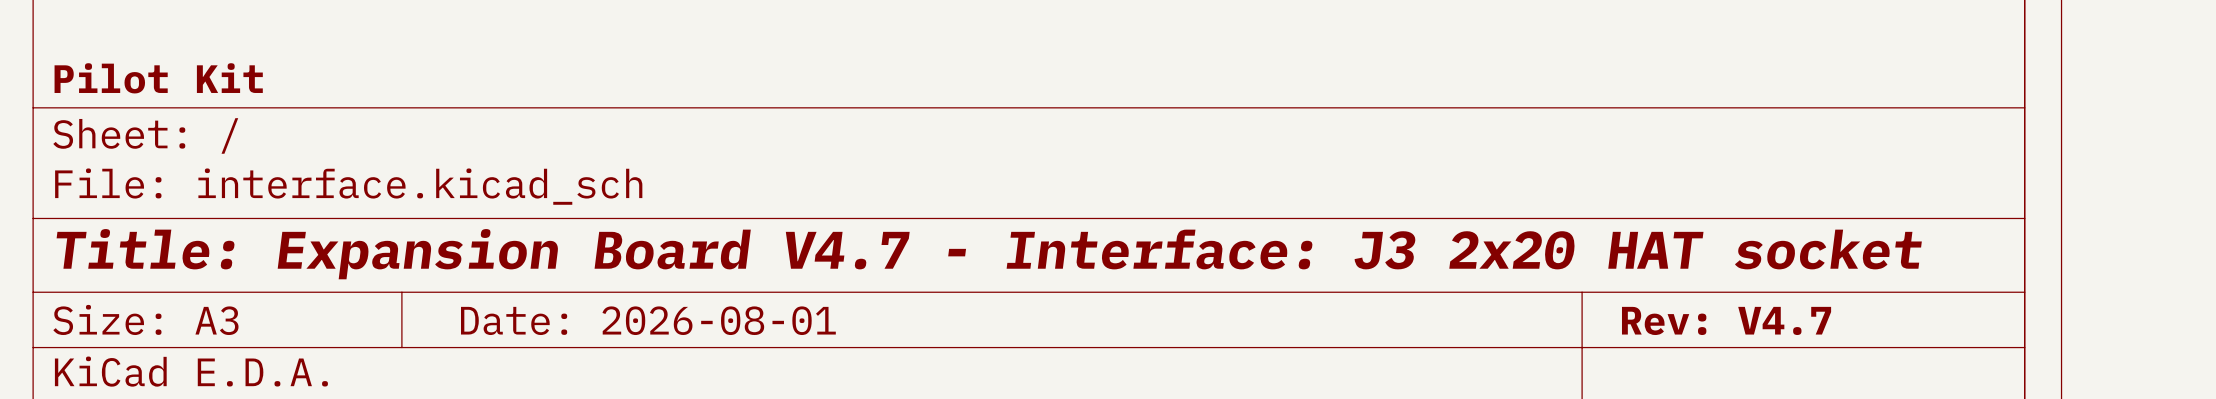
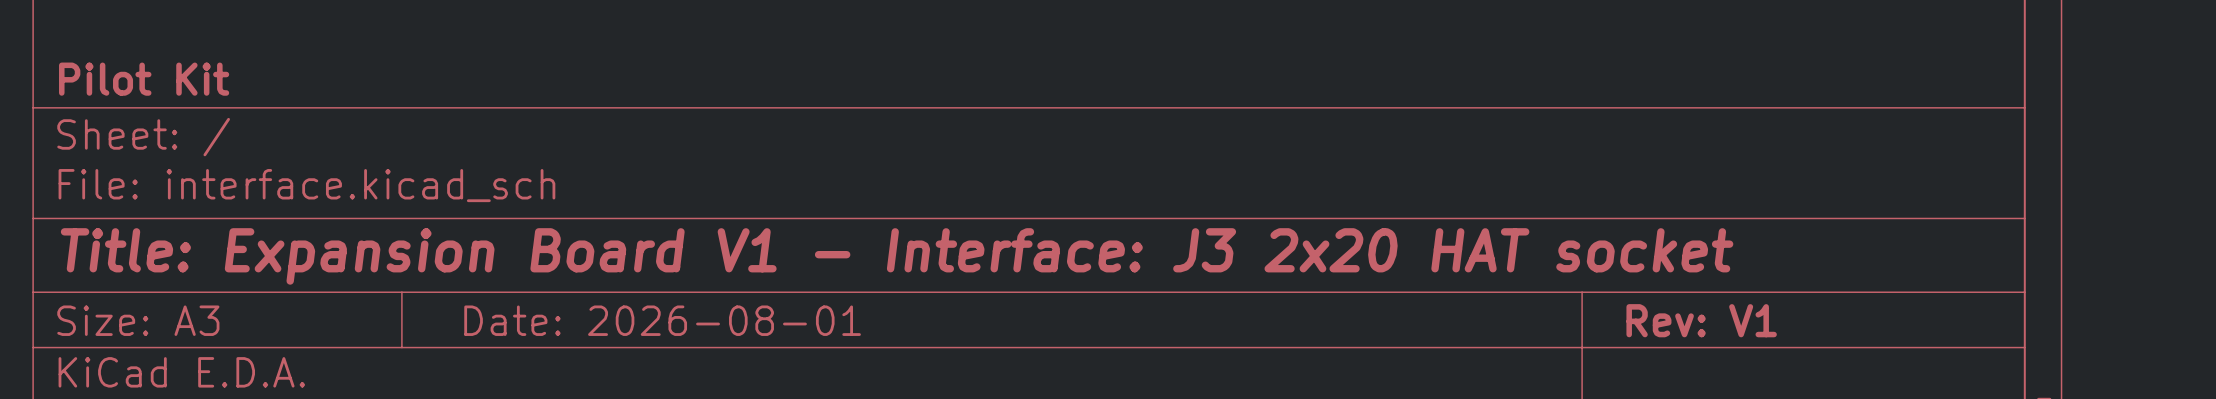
title block: Title: Expansion Board V4.7 - Interface: J3 2x20 HAT socket (989, 254) -> Title: Expansion Board V1 - Interface: J3 2x20 HAT socket (897, 256)
title block: Rev: V4.7 (1726, 320) -> Rev: V1 (1701, 320)

